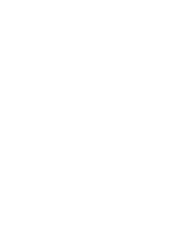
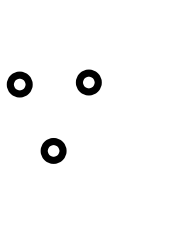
round board edge: none -> [75, 69, 102, 96]
round board edge: none -> [6, 71, 33, 98]
round board edge: none -> [40, 137, 67, 164]

